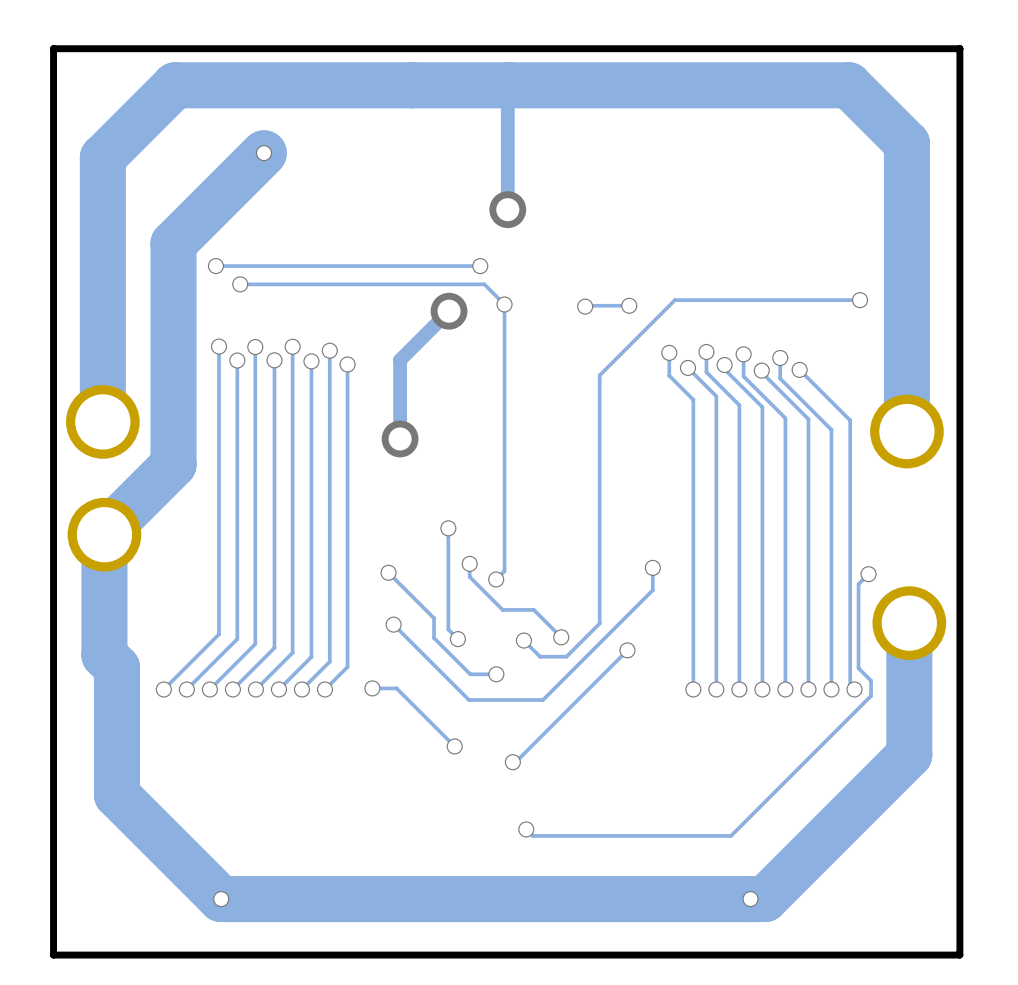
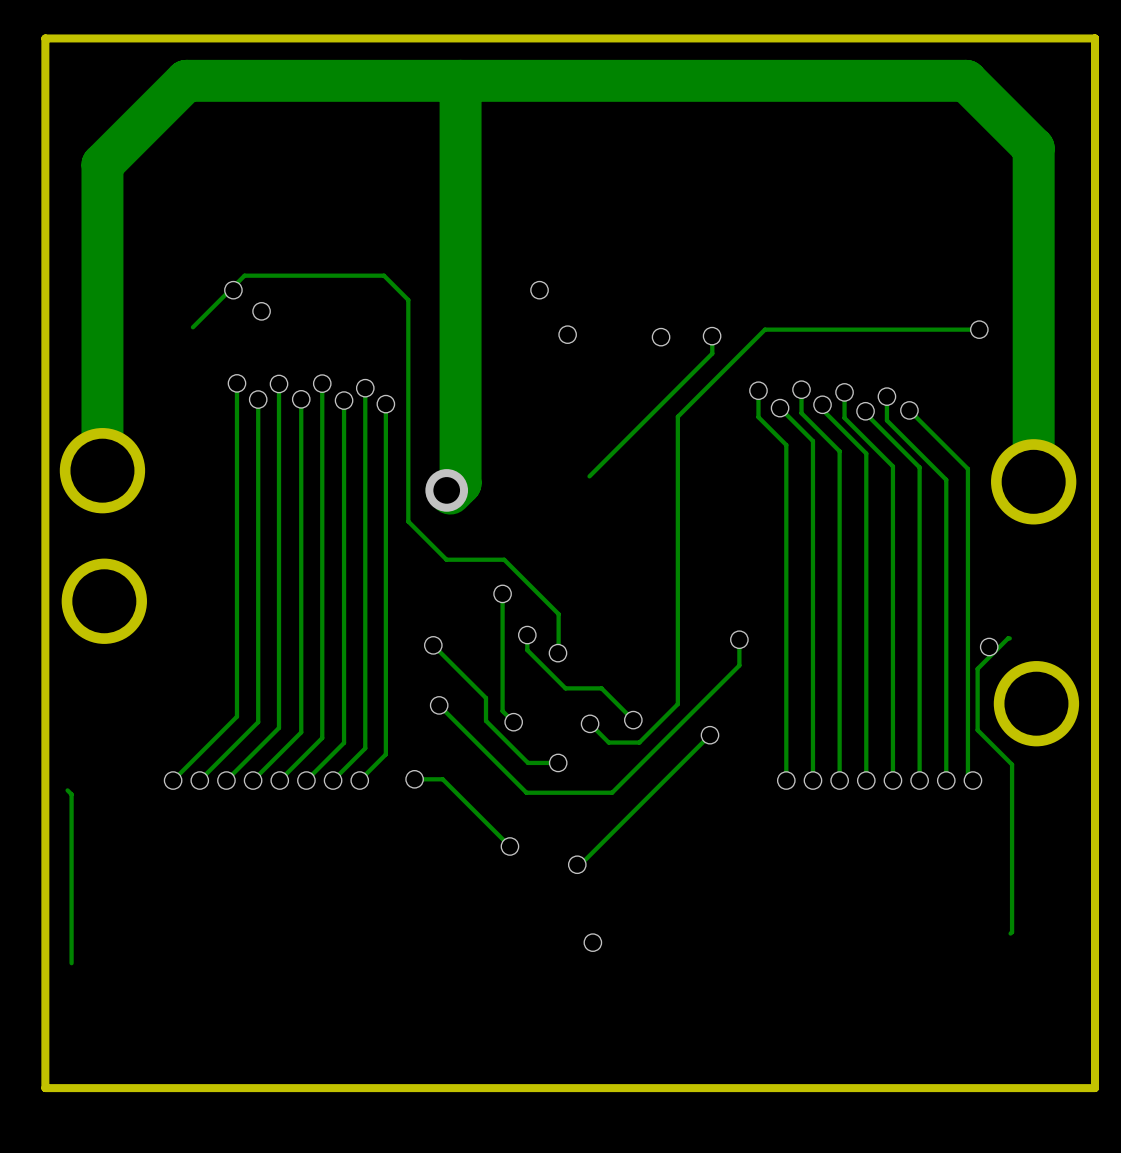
track: none -> (460, 80) (460, 483) (450, 493)
track: (509, 85) (507, 87) (507, 209) -> none
track: (263, 153) (173, 243) (173, 464) (104, 533) (104, 655) (116, 667) (116, 794) (221, 899) (764, 899) (909, 754) (909, 623) -> none
via: (263, 153) -> none
via: (507, 209) -> none
track: (480, 266) (215, 266) -> none
track: (240, 284) (484, 284) (504, 304) (504, 571) (496, 579) -> none
track: none -> (192, 327) (244, 275) (384, 275) (408, 299) (408, 521) (446, 559) (504, 559) (558, 614) (558, 655)
track: (629, 305) (585, 306) -> none
track: none -> (712, 340) (712, 353) (589, 476)
track: (449, 311) (400, 360) (400, 438) -> none
via: (449, 311) -> none
track width: thick (102, 421) (102, 157) (175, 85) (848, 85) (906, 143) (906, 431) -> thin (102, 470) (102, 164) (186, 80) (966, 80) (1033, 148) (1033, 481)
track: (868, 574) (858, 584) (858, 593) -> (1009, 638) (977, 668)
track: (858, 645) (858, 668) (871, 680) (871, 695) (731, 835) (532, 835) (526, 829) -> (977, 730) (1012, 764) (1010, 933)
track: none -> (67, 790) (71, 794) (71, 963)
via: (221, 899) -> none
via: (750, 899) -> none

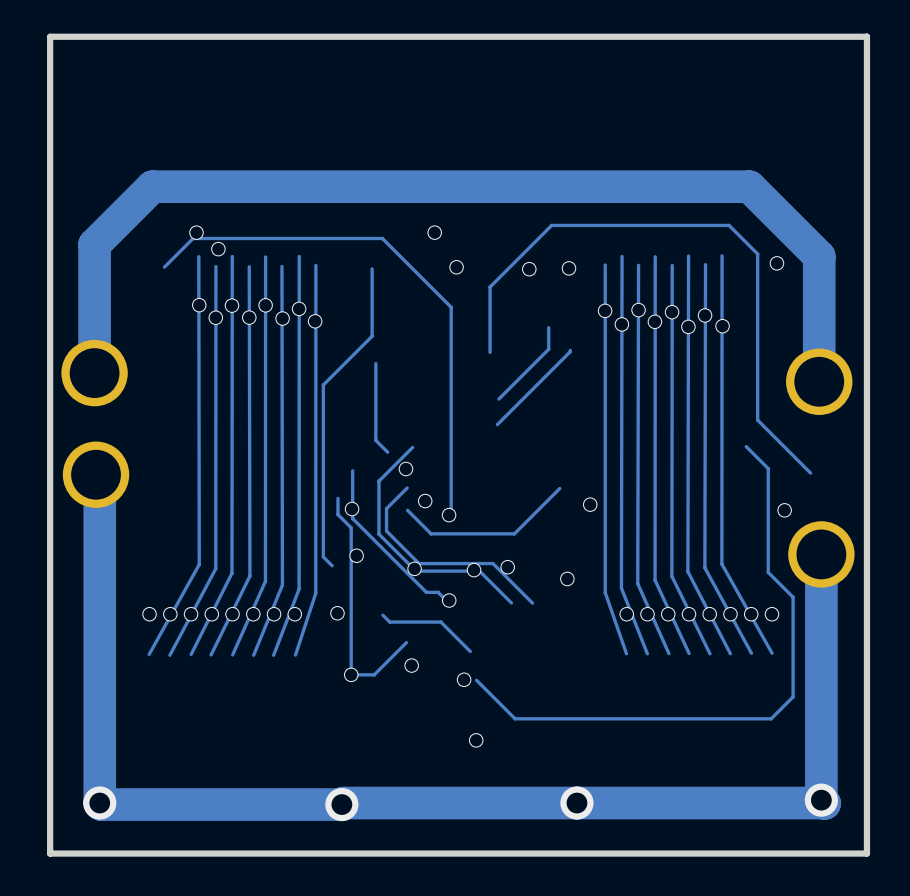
track: (460, 80) (460, 483) (450, 493) -> none
track: (102, 305) (102, 164) (186, 80) (966, 80) (1033, 148) (1033, 320) -> (94, 244) (152, 186) (749, 186) (819, 256)
track: none -> (722, 255) (721, 564) (772, 653)
track: none -> (232, 256) (231, 573) (191, 654)
track: none -> (299, 256) (299, 589) (273, 655)
track: none -> (622, 256) (621, 588) (647, 653)
track: none -> (688, 256) (687, 571) (730, 653)
track: none -> (198, 256) (199, 564) (149, 654)
track: none -> (265, 256) (265, 581) (232, 654)
track: none -> (655, 256) (655, 580) (689, 653)
track: (192, 327) (244, 275) (384, 275) (408, 299) (408, 521) (446, 559) (504, 559) (558, 614) (558, 655) -> none
track: (979, 329) (764, 329) (677, 416) (677, 704) (639, 742) (608, 742) (590, 723) -> none
track: none -> (605, 264) (605, 592) (626, 653)
track: none -> (705, 264) (704, 567) (751, 653)
track: none -> (315, 265) (315, 593) (295, 655)
track: none -> (638, 265) (637, 583) (668, 653)
track: none -> (672, 265) (671, 576) (709, 653)
track: none -> (215, 266) (215, 568) (169, 655)
track: none -> (281, 266) (282, 585) (253, 655)
track: none -> (164, 267) (193, 238) (382, 238) (451, 307) (451, 510)
track: none -> (249, 266) (249, 576) (211, 654)
track: none -> (372, 268) (372, 336) (323, 385) (323, 556) (332, 565)
track: (712, 340) (712, 353) (589, 476) -> none
track: (236, 383) (236, 716) (173, 780) -> none
track: (279, 383) (279, 727) (226, 780) -> none
track: (322, 383) (322, 738) (279, 780) -> none
track: (365, 388) (365, 748) (333, 780) -> none
track: (801, 389) (801, 413) (839, 451) (839, 780) -> none
track: (758, 390) (758, 417) (786, 445) (786, 780) -> none
track: (844, 392) (844, 418) (892, 466) (892, 780) -> none
track: (886, 396) (886, 420) (946, 479) (946, 780) -> none
track: (258, 399) (258, 722) (199, 780) -> none
track: (301, 399) (301, 732) (253, 780) -> none
track: (344, 400) (344, 742) (306, 780) -> none
track: (385, 404) (385, 754) (359, 780) -> none
track: (822, 404) (822, 409) (866, 453) (866, 780) -> none
track: (780, 408) (812, 441) (812, 780) -> none
track: (909, 410) (967, 468) (967, 775) (972, 780) -> none
track: (865, 411) (919, 467) (919, 780) -> none
track: none -> (548, 327) (548, 349) (498, 399)
track: none -> (570, 350) (497, 424)
track: none -> (490, 352) (490, 287) (551, 225) (729, 225) (757, 254) (757, 420) (810, 473)
track: none -> (375, 363) (375, 440) (387, 452)
via: (446, 490) -> none
track: none -> (746, 446) (768, 468) (768, 572) (793, 597) (793, 696) (771, 718) (515, 718) (476, 680)
track: none -> (412, 447) (378, 481) (378, 534) (415, 571) (479, 571) (511, 602)
track: (502, 593) (502, 711) (513, 722) -> none
track: none -> (352, 470) (352, 518) (426, 592) (438, 592) (449, 603)
track: none -> (96, 474) (99, 478) (99, 803) (101, 804) (824, 803)
track: none -> (407, 487) (386, 508) (386, 531) (419, 563) (492, 563) (532, 603)
track: none -> (559, 488) (514, 533) (431, 533) (407, 510)
track: none -> (337, 498) (337, 514) (351, 527) (351, 674) (374, 674) (406, 642)
track: (527, 635) (527, 650) (565, 688) (601, 688) (633, 720) -> none
track: (1009, 638) (977, 668) (977, 730) (1012, 764) (1010, 933) -> none
track: (739, 639) (739, 665) (612, 792) (526, 792) (439, 705) -> none
track: (433, 645) (486, 698) (486, 720) (528, 762) (558, 762) -> none
track: none -> (821, 554) (821, 800) (824, 803)
track: (710, 735) (580, 864) (577, 864) -> none
track: (414, 779) (442, 779) (509, 846) -> none
track: none -> (382, 615) (389, 622) (440, 622) (470, 651)
track: (67, 790) (71, 794) (71, 963) -> none
via: none -> (351, 674)
via: none -> (821, 800)
via: none -> (99, 803)
via: none -> (576, 803)
via: none -> (341, 804)

